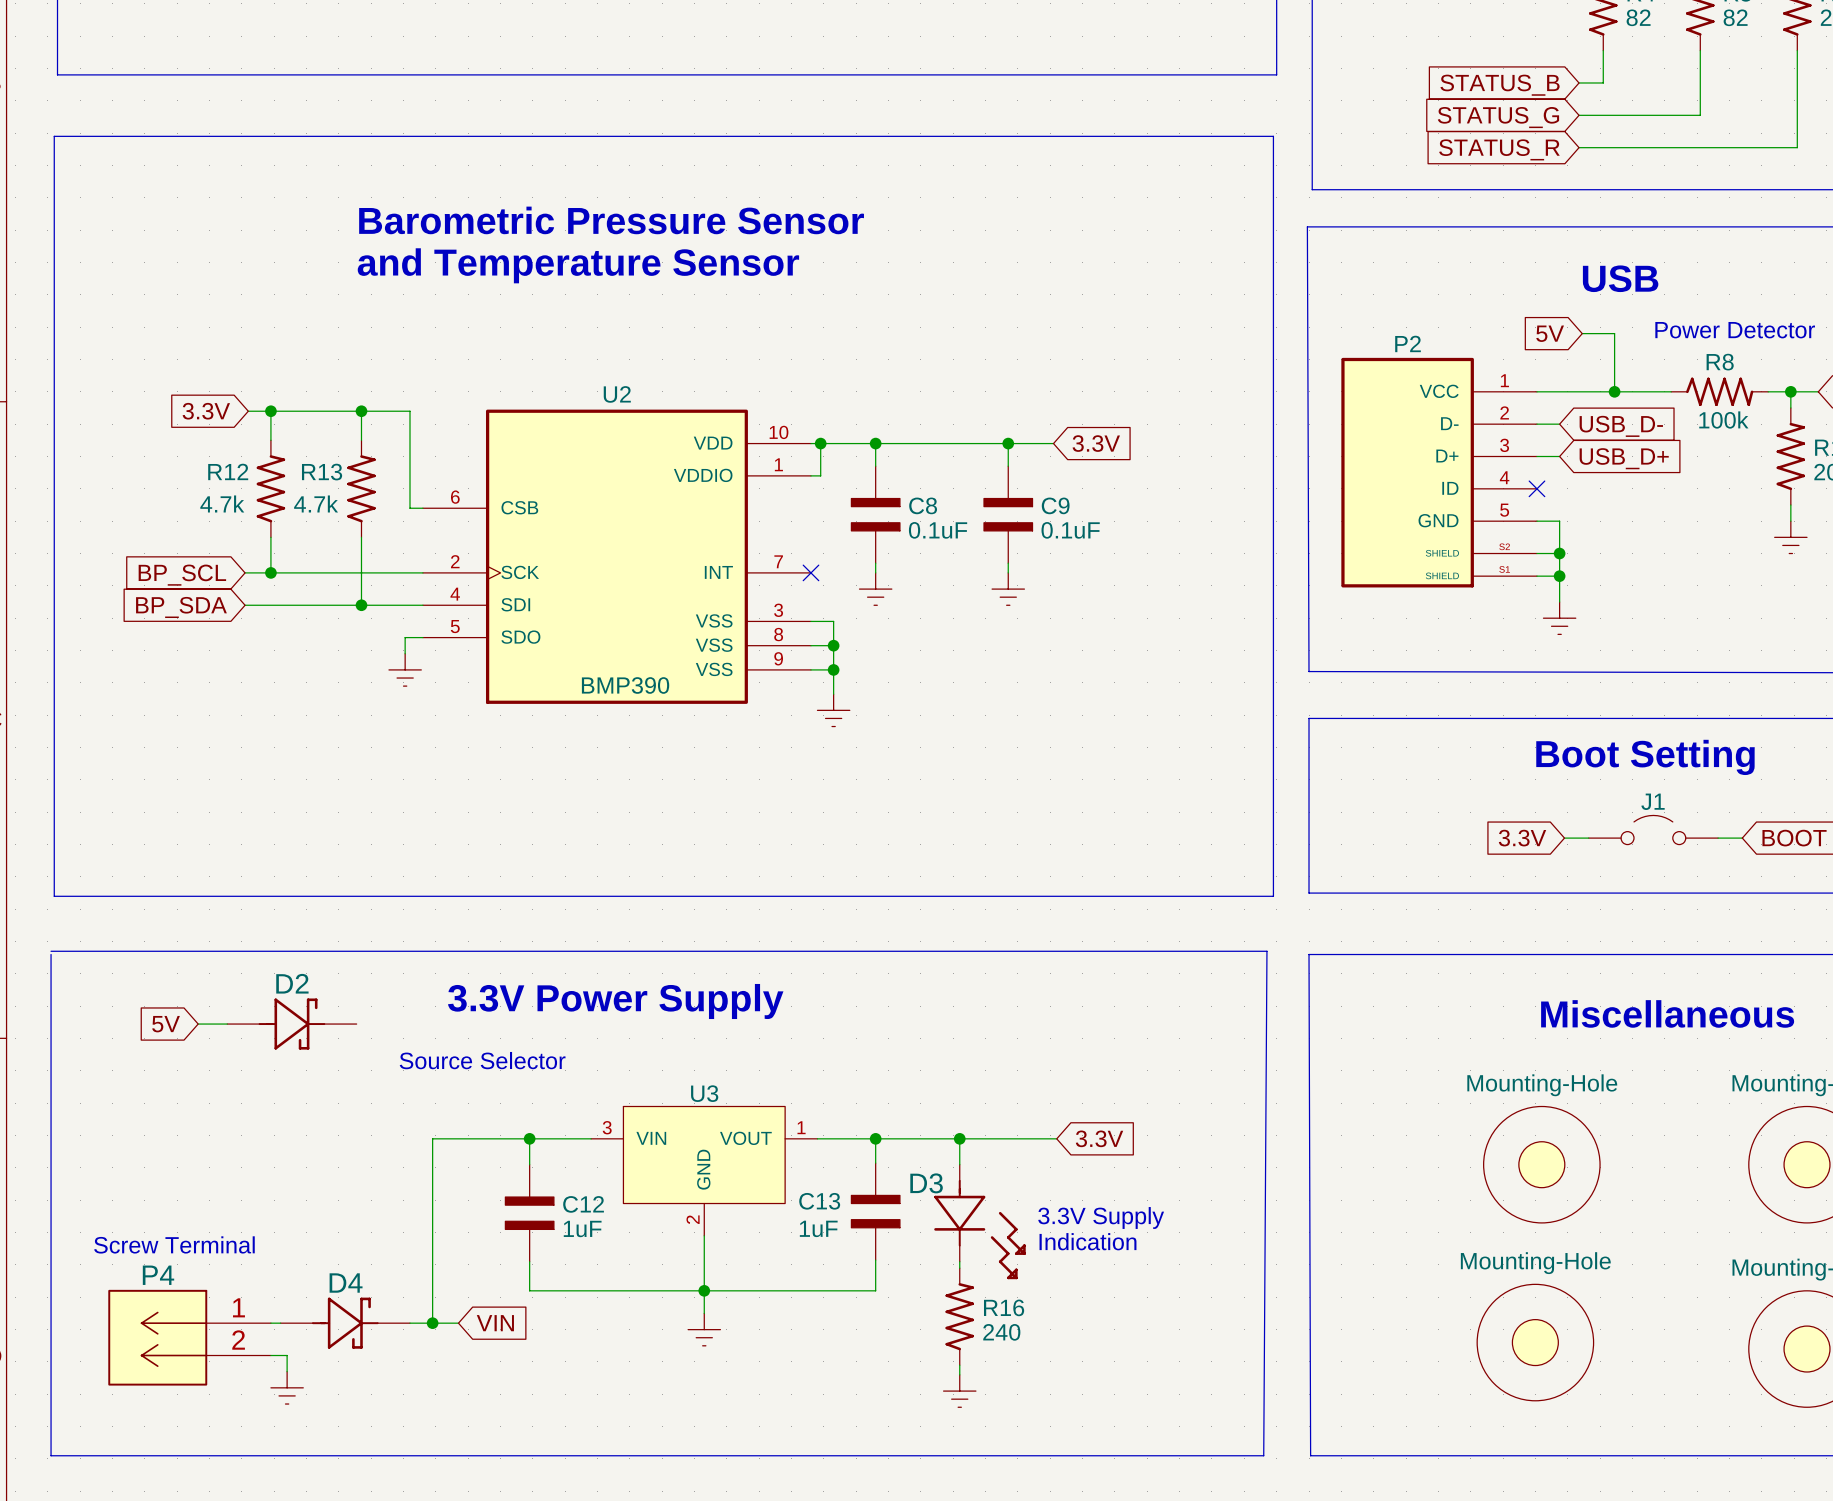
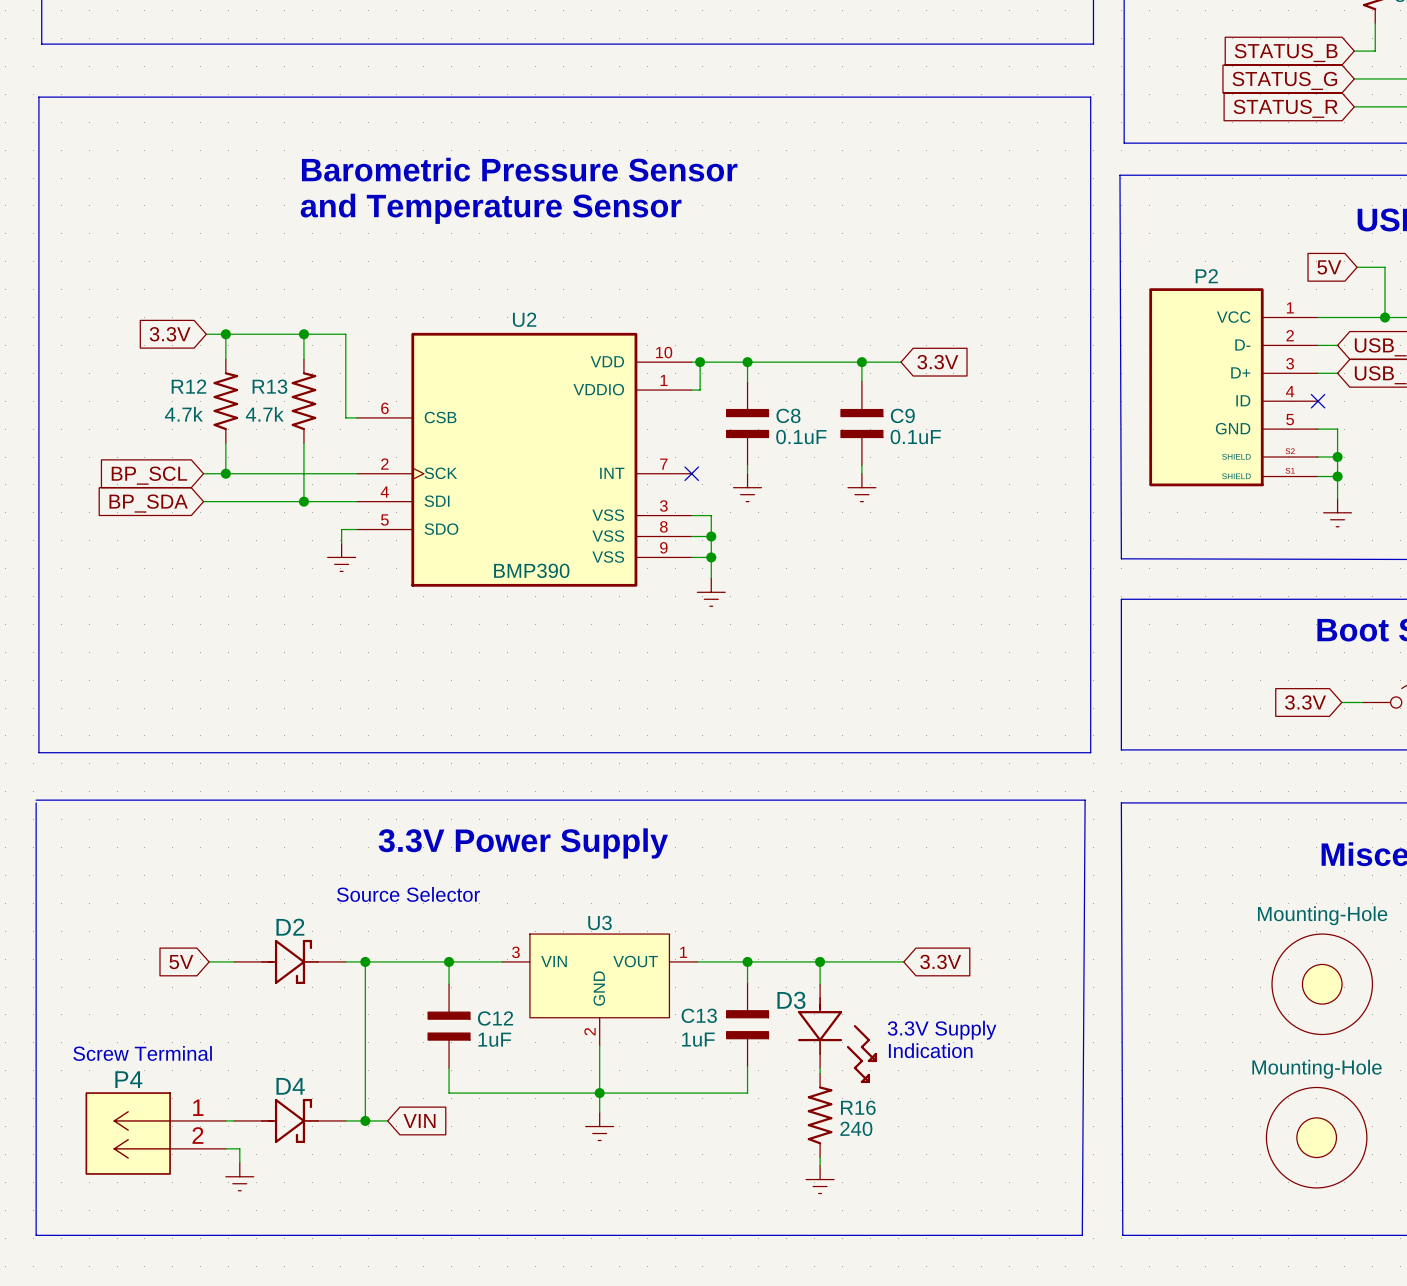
global label position: 5V (166, 1024) -> 5V (181, 962)
wire: (198, 1024) (227, 1024) -> (209, 961) (234, 961)
D2 position: (291, 1024) -> (290, 961)
wire: none -> (345, 961) (365, 961)
junction: none -> (365, 961)

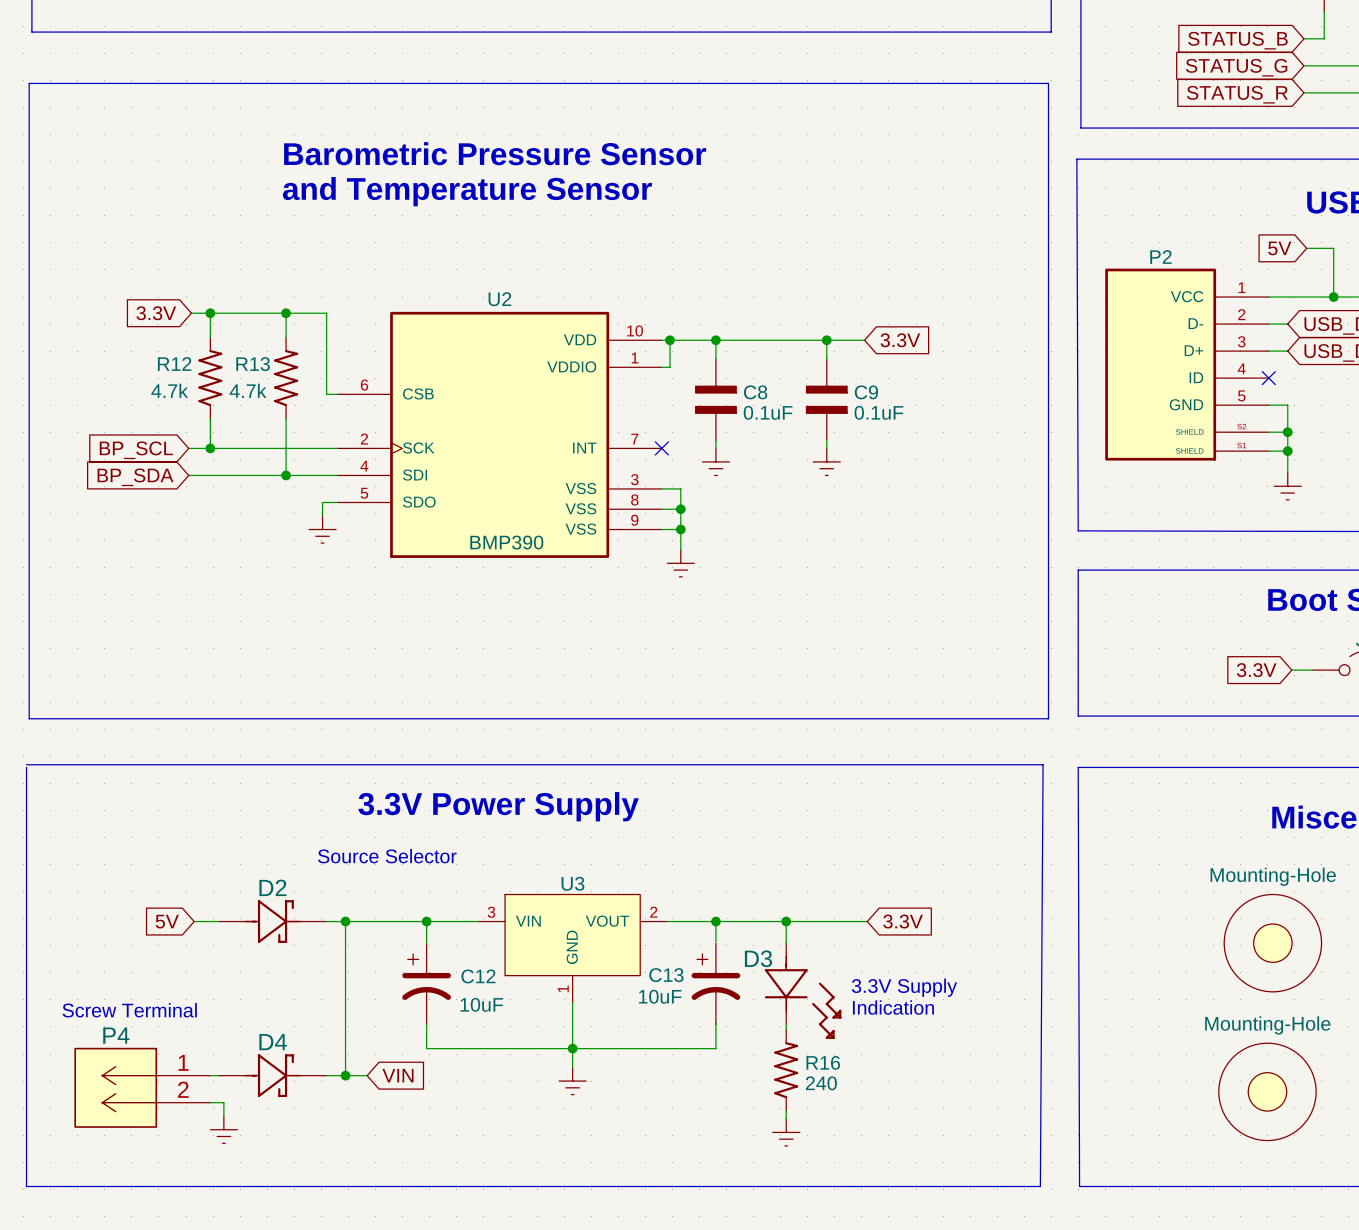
U3 pin number: 1 (683, 952) -> 2 (653, 912)
C13 symbol: [726, 982, 769, 1067] -> [691, 943, 741, 1025]
C12 symbol: [428, 984, 470, 1068] -> [402, 943, 451, 1025]
U3 pin number: 2 (590, 1031) -> 1 (563, 988)
C12 value: 1uF (494, 1039) -> 10uF (481, 1004)
C13 value: 1uF (698, 1039) -> 10uF (660, 996)

